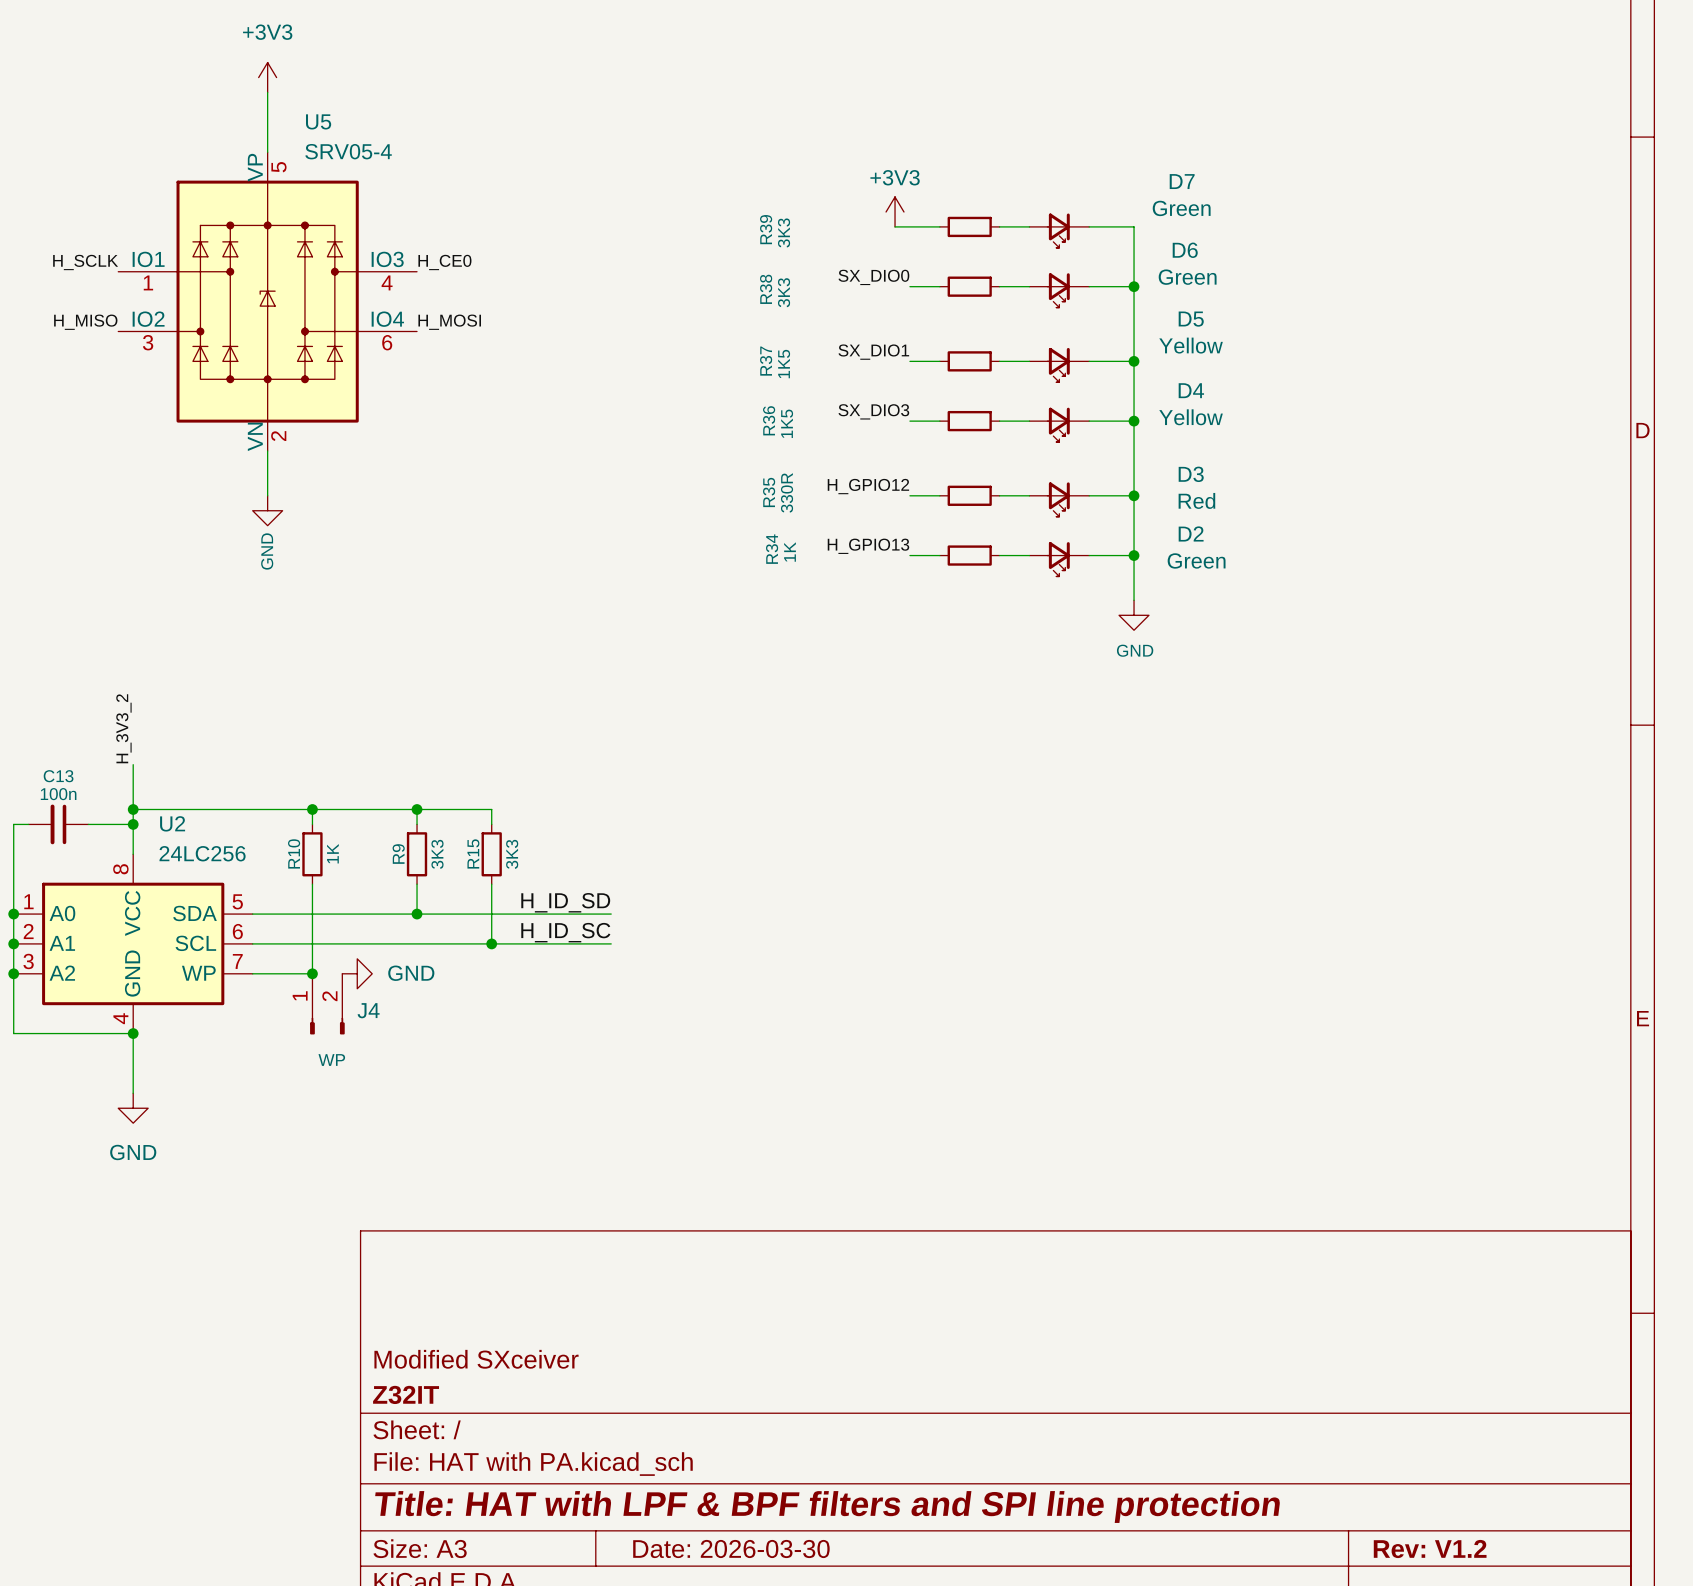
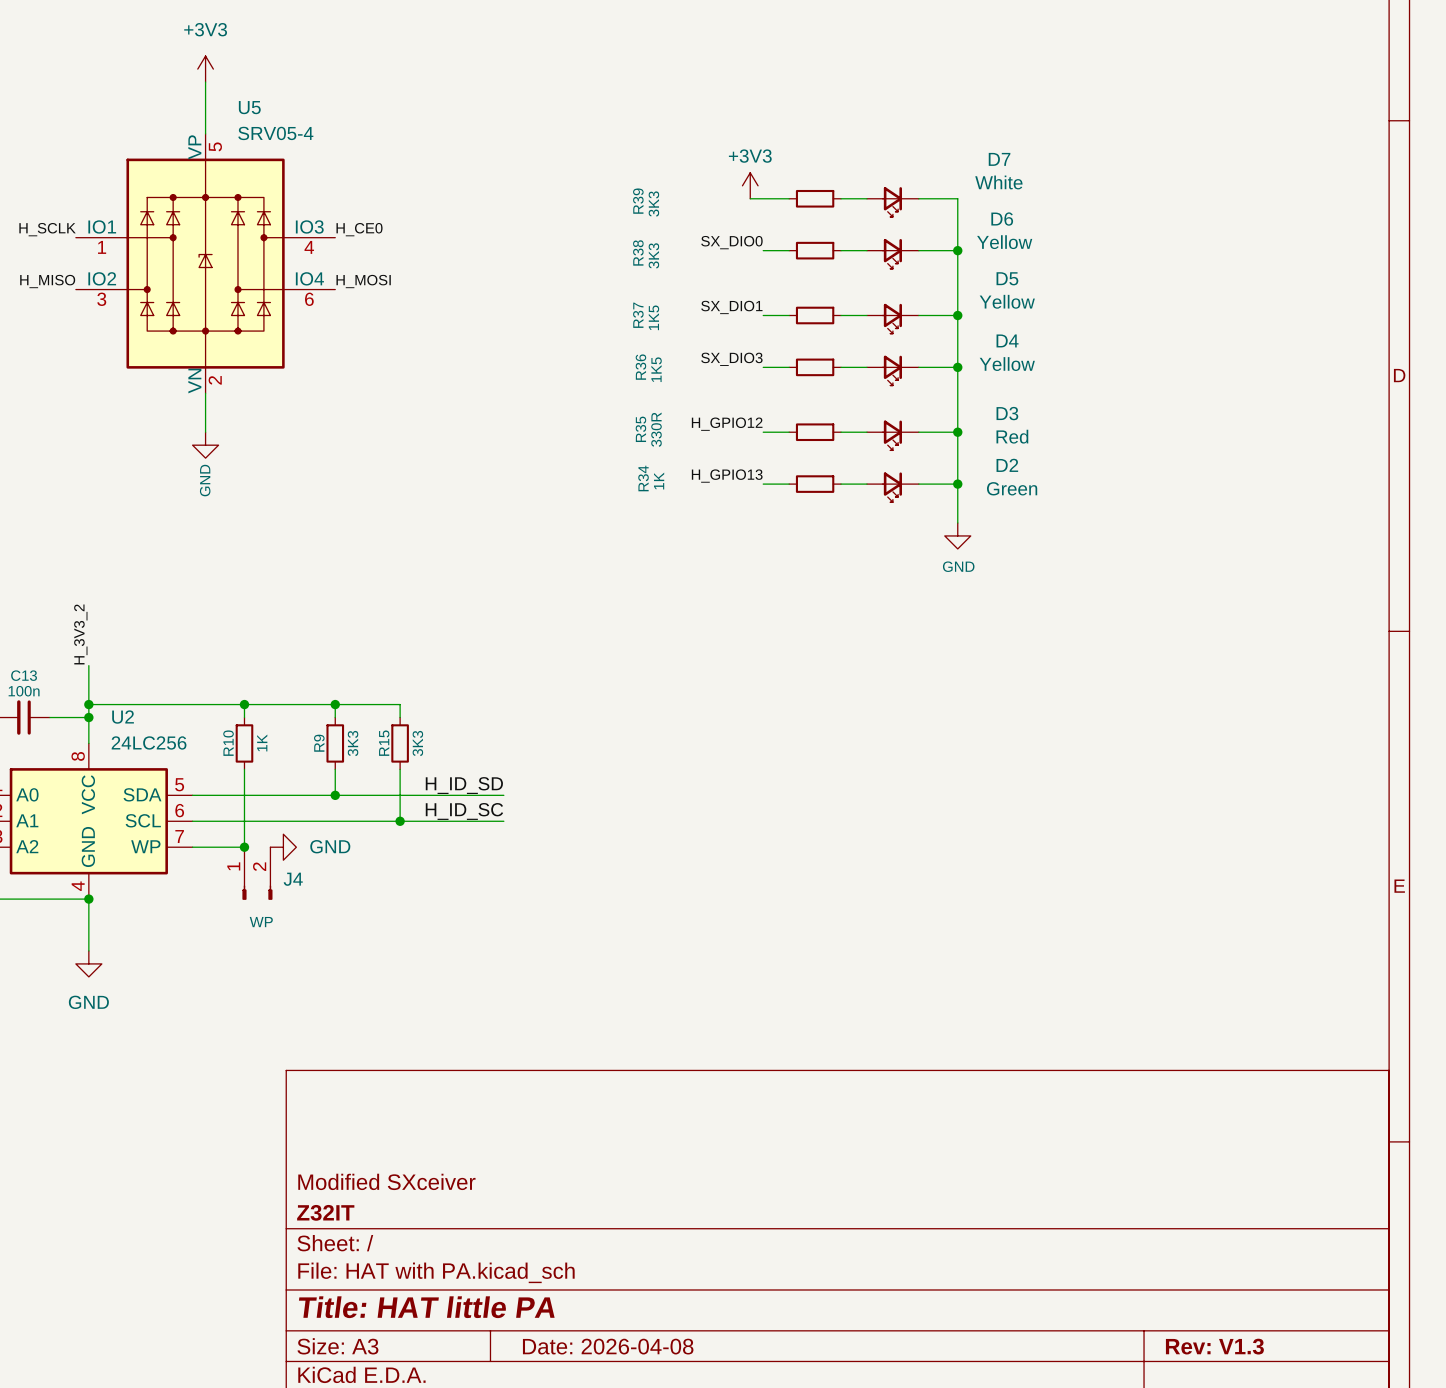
D7 value: Green (1181, 208) -> White (998, 182)
D6 value: Green (1187, 277) -> Yellow (1004, 242)
title block: Title: HAT with LPF & BPF filters and SPI line protection (827, 1507) -> Title: HAT little PA (426, 1307)
title block: Date: 2026-03-30 (731, 1549) -> Date: 2026-04-08 (608, 1346)
title block: Rev: V1.2 (1430, 1549) -> Rev: V1.3 (1214, 1346)

